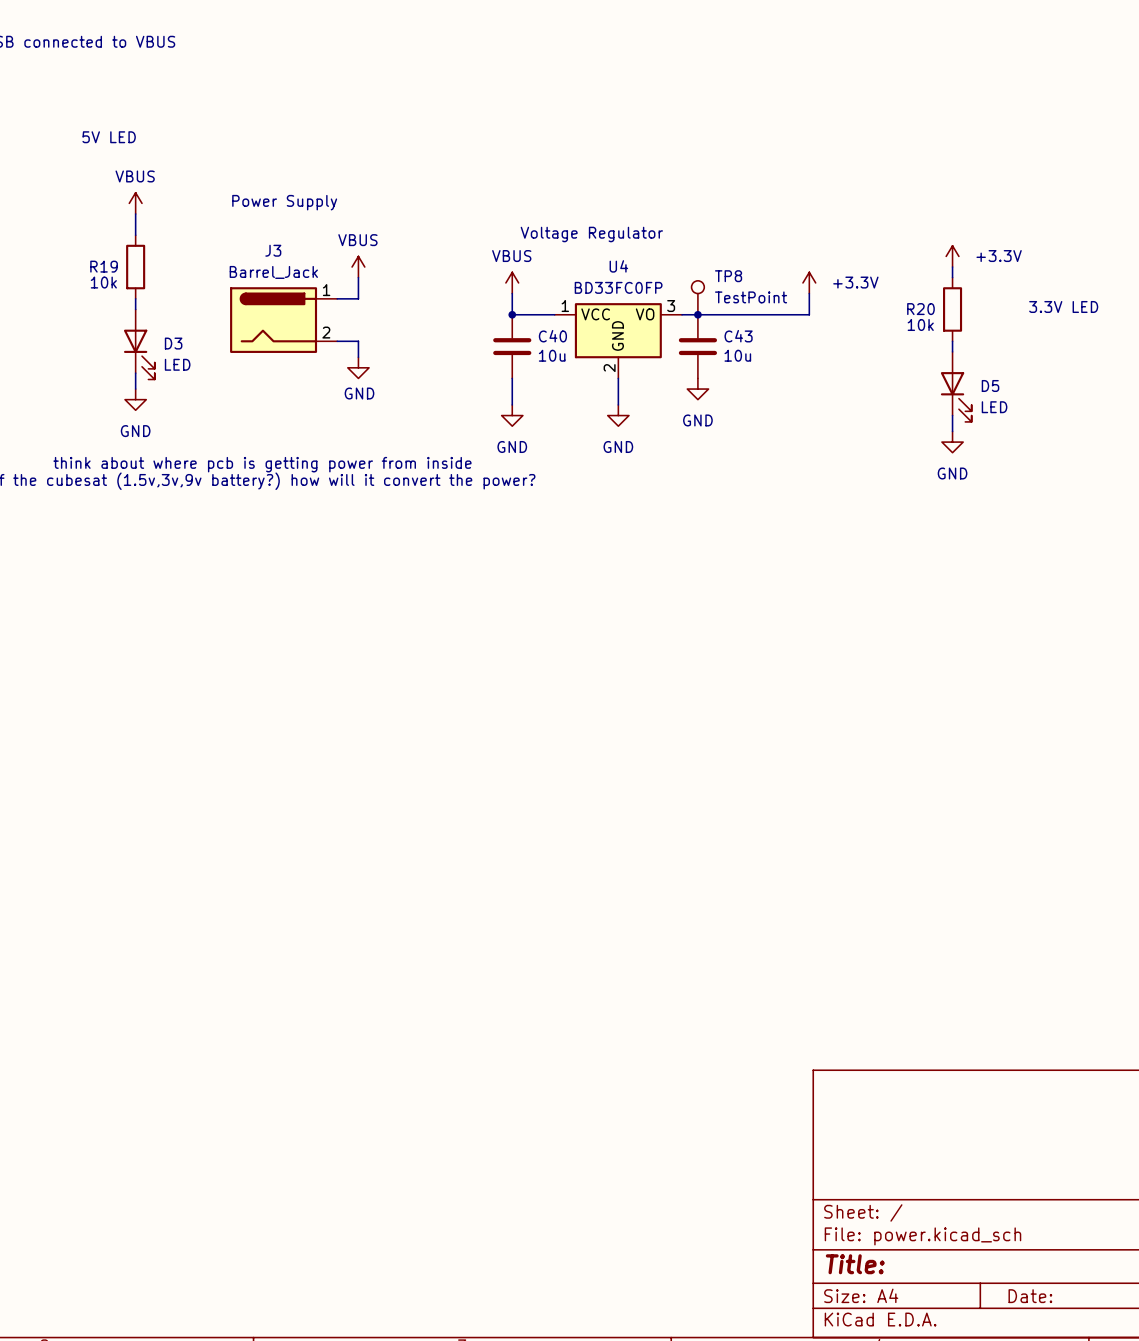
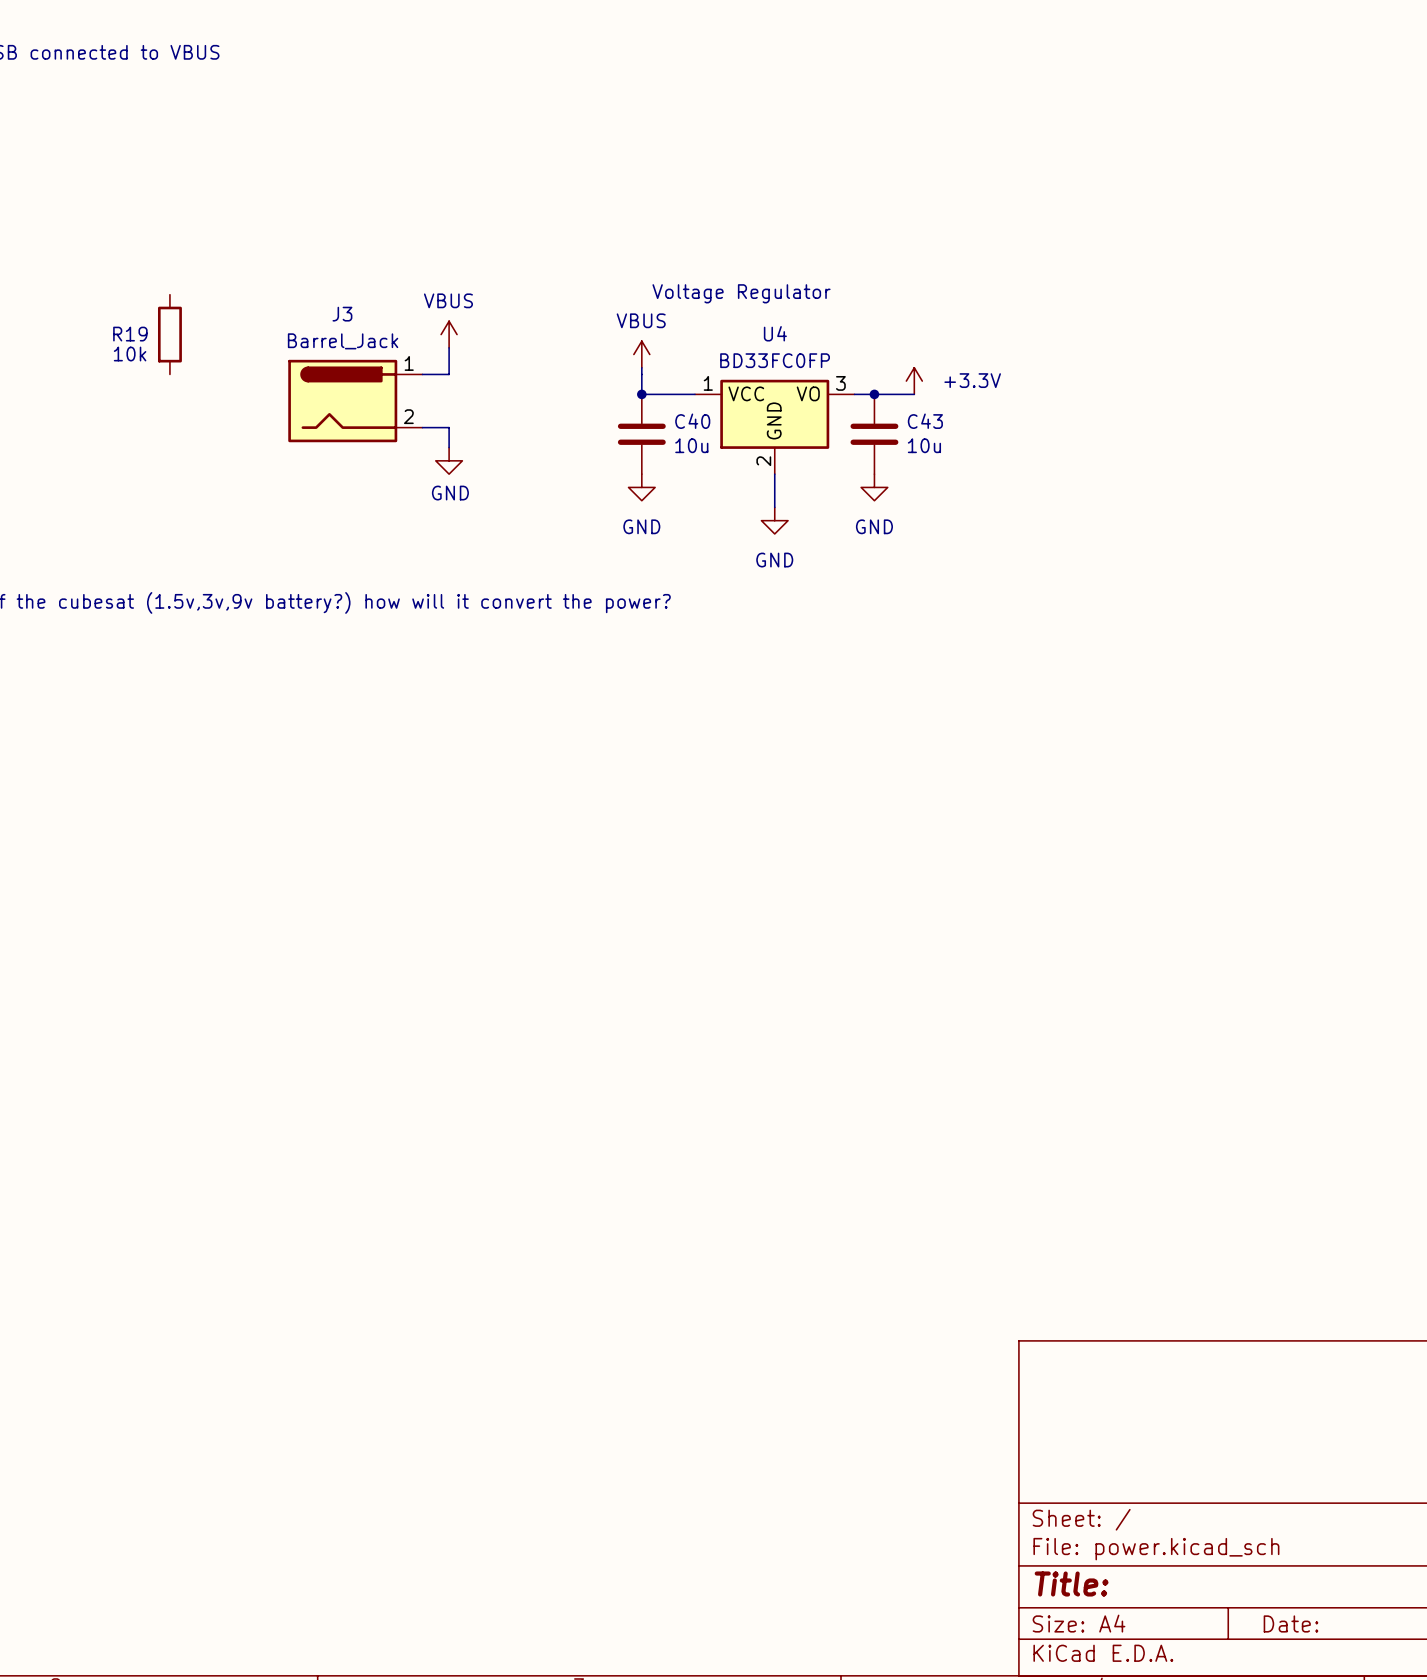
text: 5V LED (109, 137) -> none
text: Power Supply (284, 202) -> none
power symbol: VBUS (135, 203) -> none
wire: (135, 213) (135, 235) -> none
power symbol: +3.3V (952, 256) -> none
wire: (952, 267) (952, 277) -> none
power symbol position: +3.3V (809, 282) -> +3.3V (914, 381)
wire: (809, 293) (809, 314) (729, 314) -> none
TP8: TestPoint (697, 297) -> none
wire: (135, 298) (135, 309) -> none
text: 3.3V LED (1063, 306) -> none
R20: 10k (952, 309) -> none
wire: (952, 341) (952, 351) -> none
D3: LED (139, 344) -> none
wire: (135, 373) (135, 389) -> none
wire: (512, 378) (512, 404) -> none
D5: LED (956, 386) -> none
power symbol: GND (135, 399) -> none
power symbol position: GND (512, 415) -> GND (641, 487)
wire: (952, 415) (952, 431) -> none
power symbol: GND (952, 442) -> none
text: think about where pcb is getting power from inside (262, 464) -> none

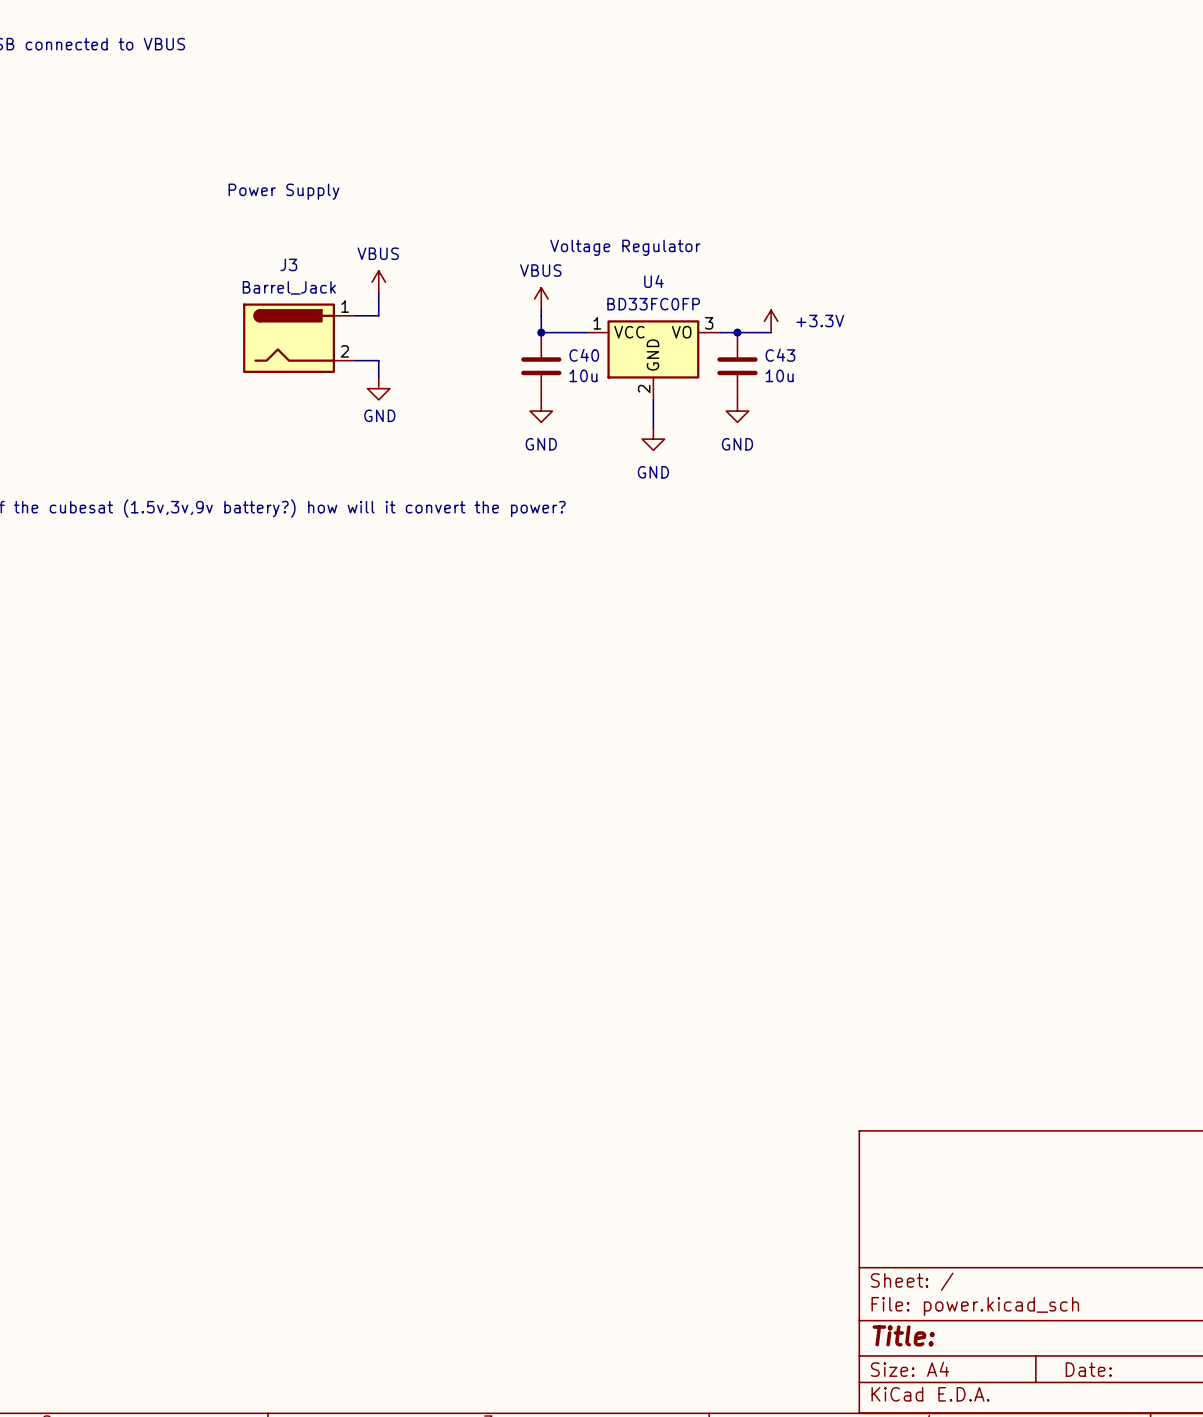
text: none -> Power Supply (283, 191)
R19: 10k (169, 334) -> none

